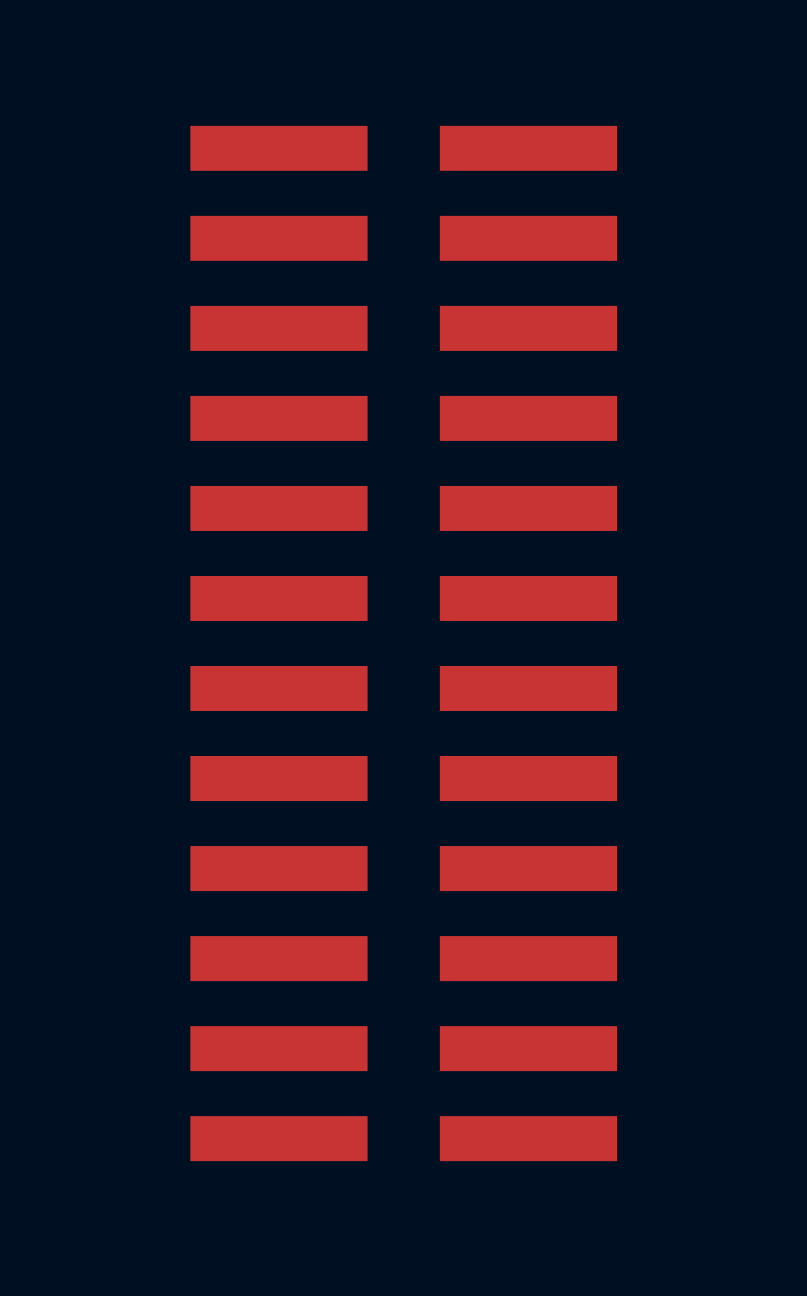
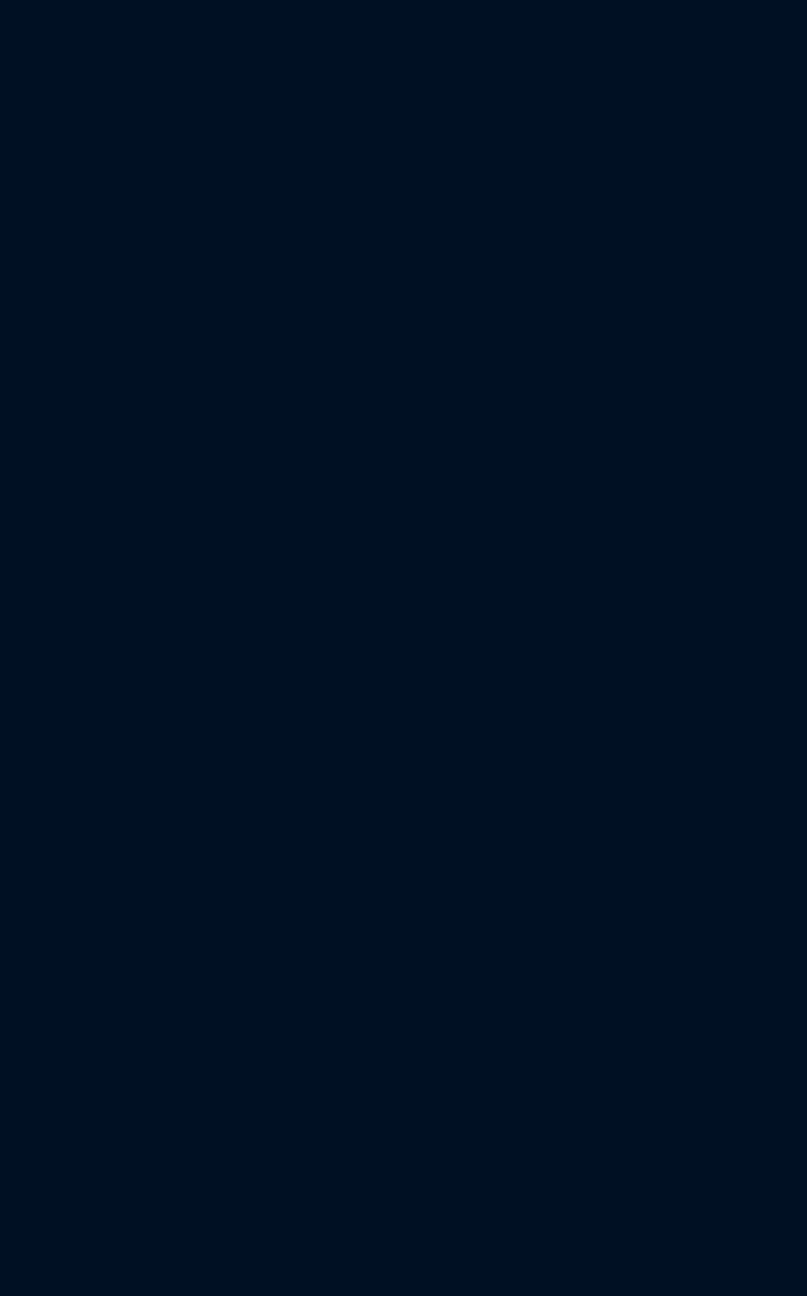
part: (403, 643) -> none

